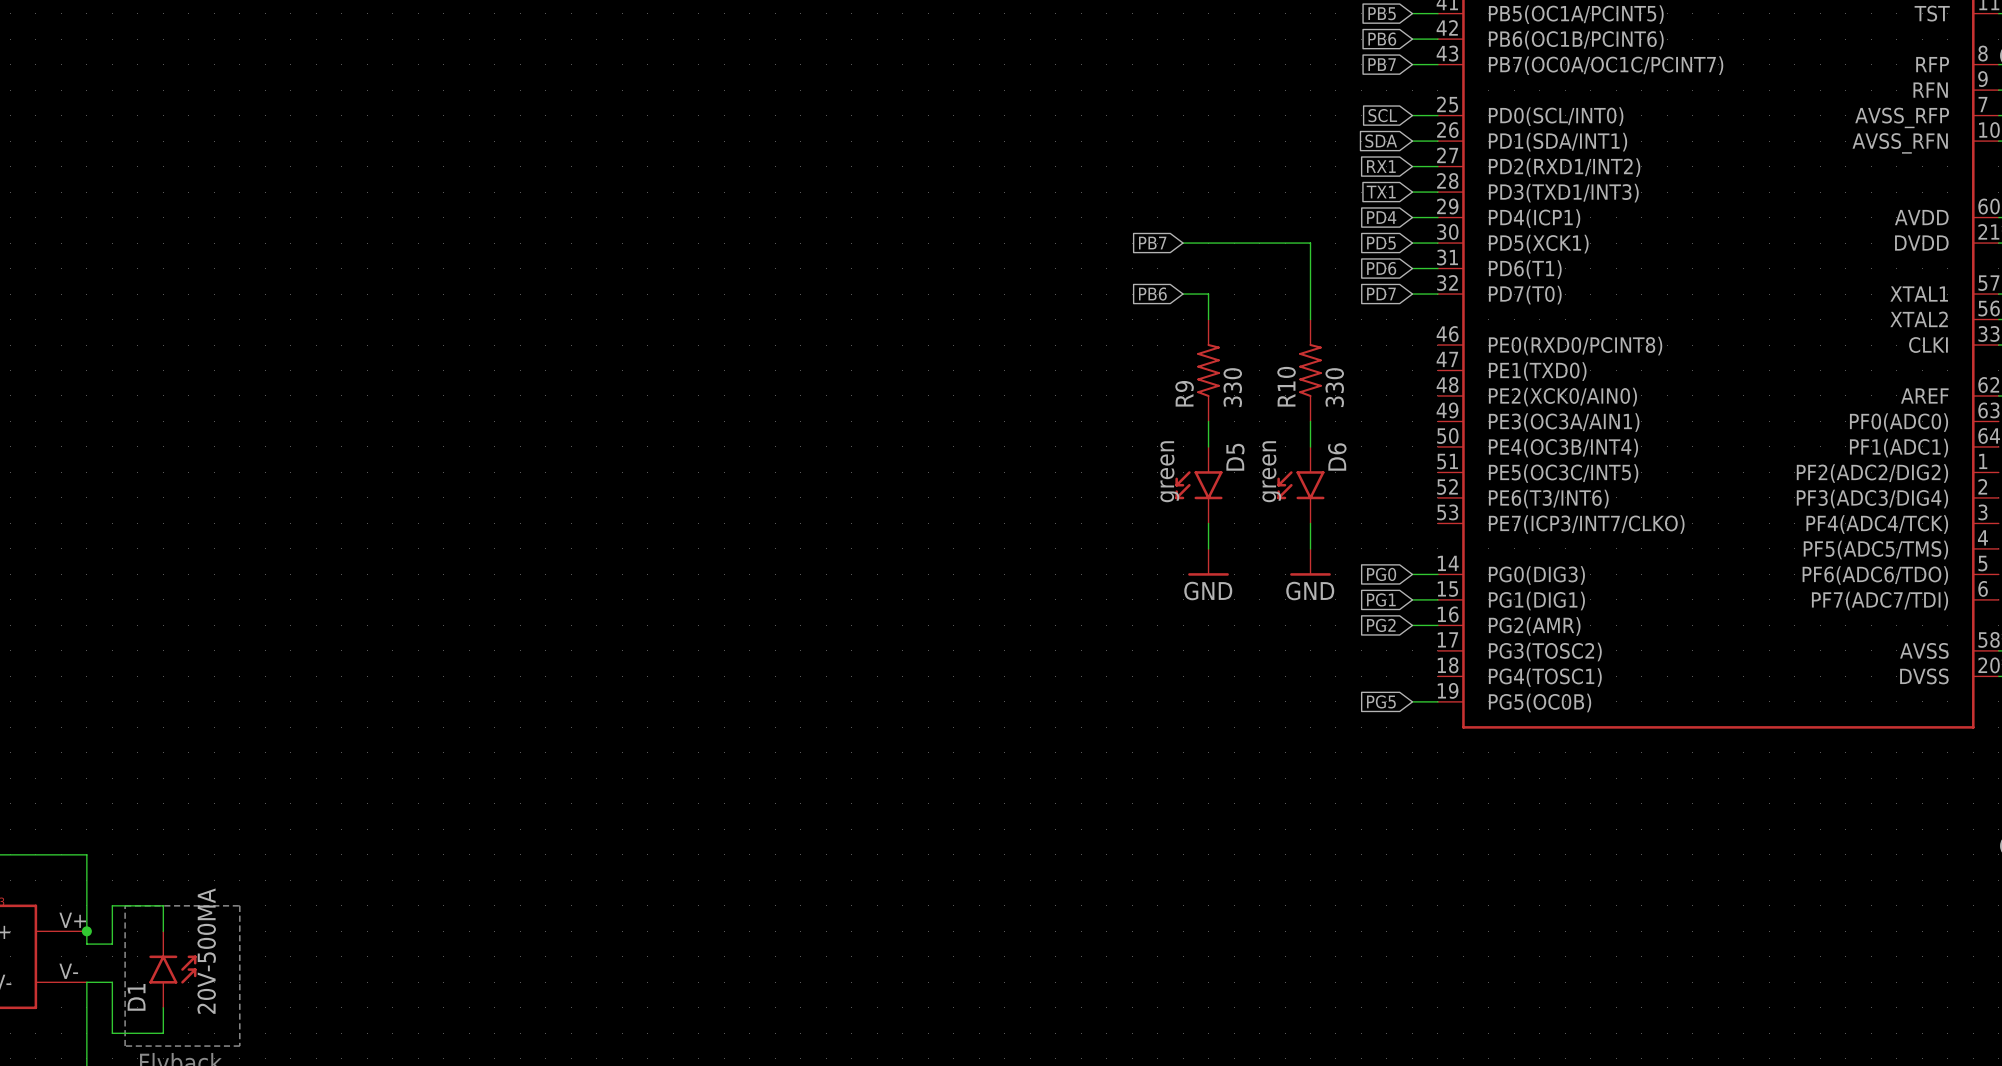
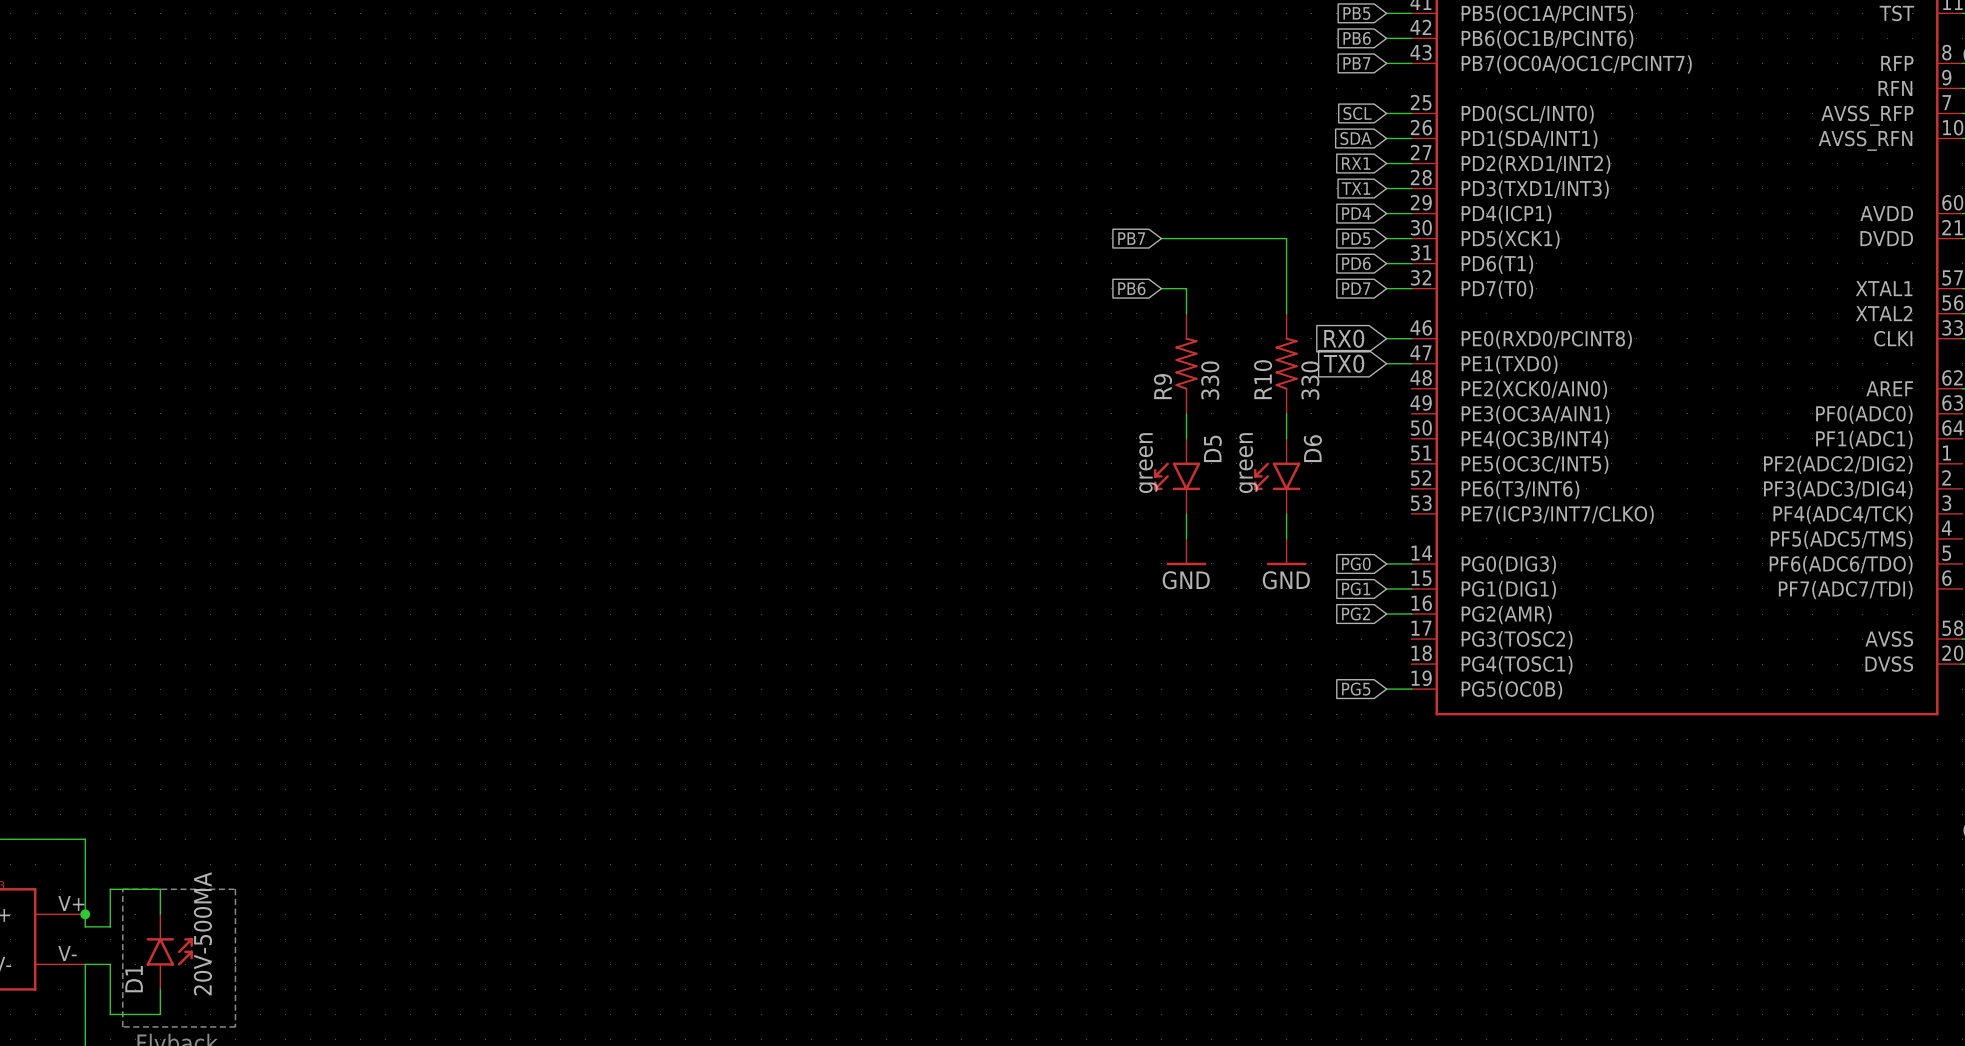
global label: none -> RX0 (1344, 338)
wire: none -> (1386, 338) (1411, 338)
global label: none -> TX0 (1344, 363)
wire: none -> (1386, 363) (1411, 363)

